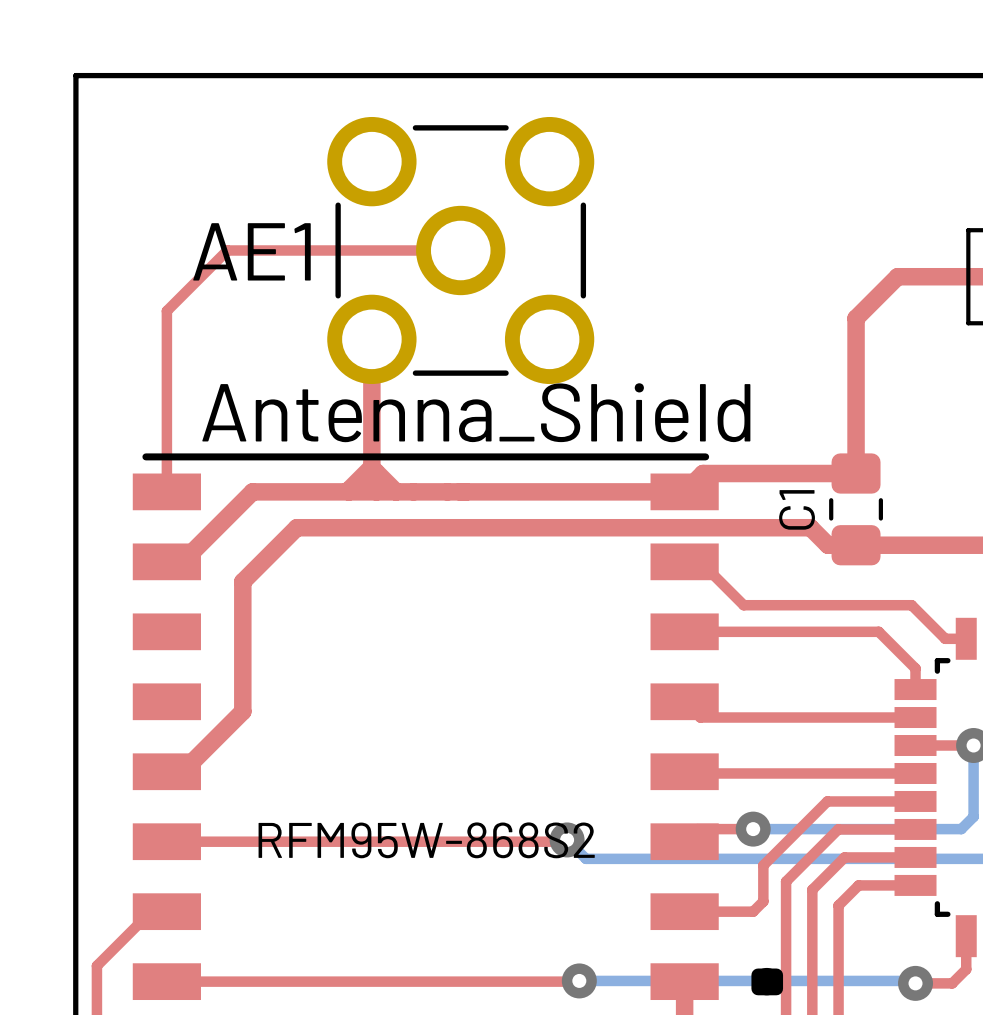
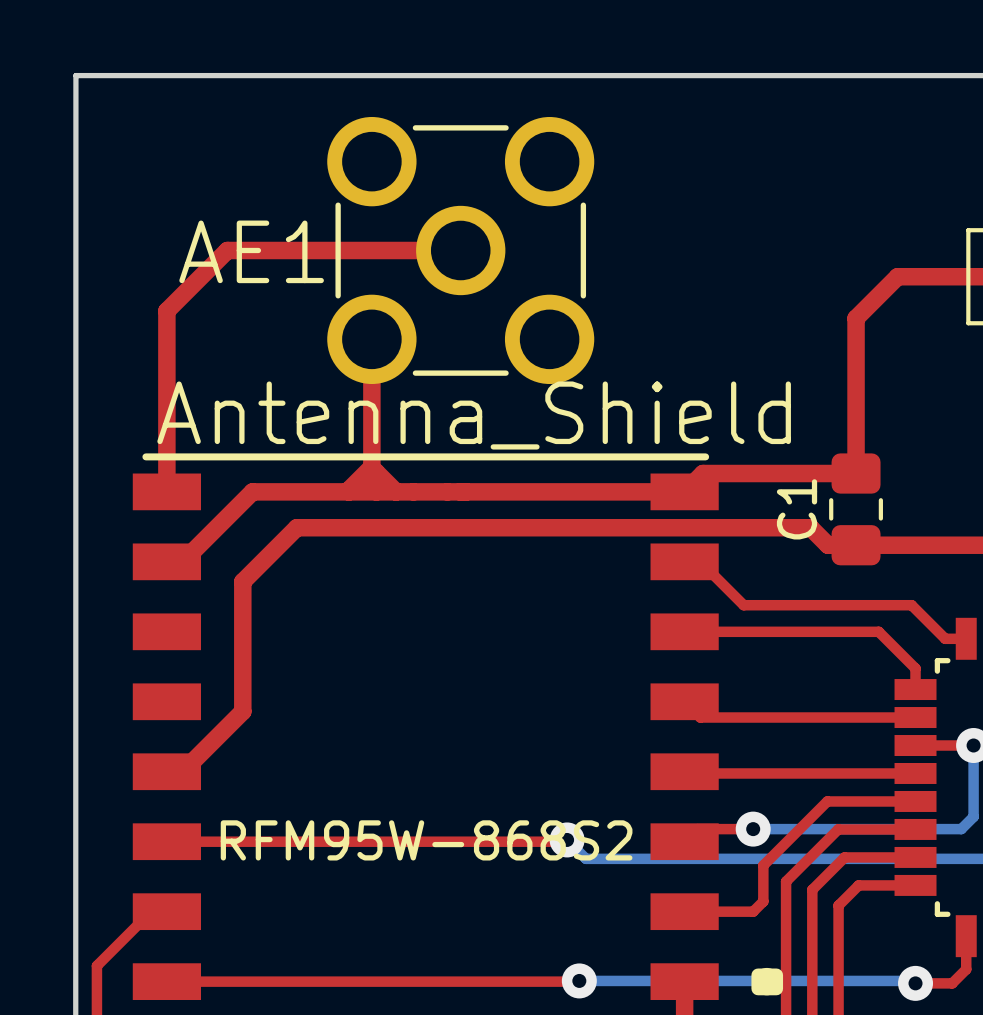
top track width: thin (460, 250) (227, 250) (166, 311) (166, 491) -> thick (460, 250) (227, 250) (166, 311) (166, 491)

